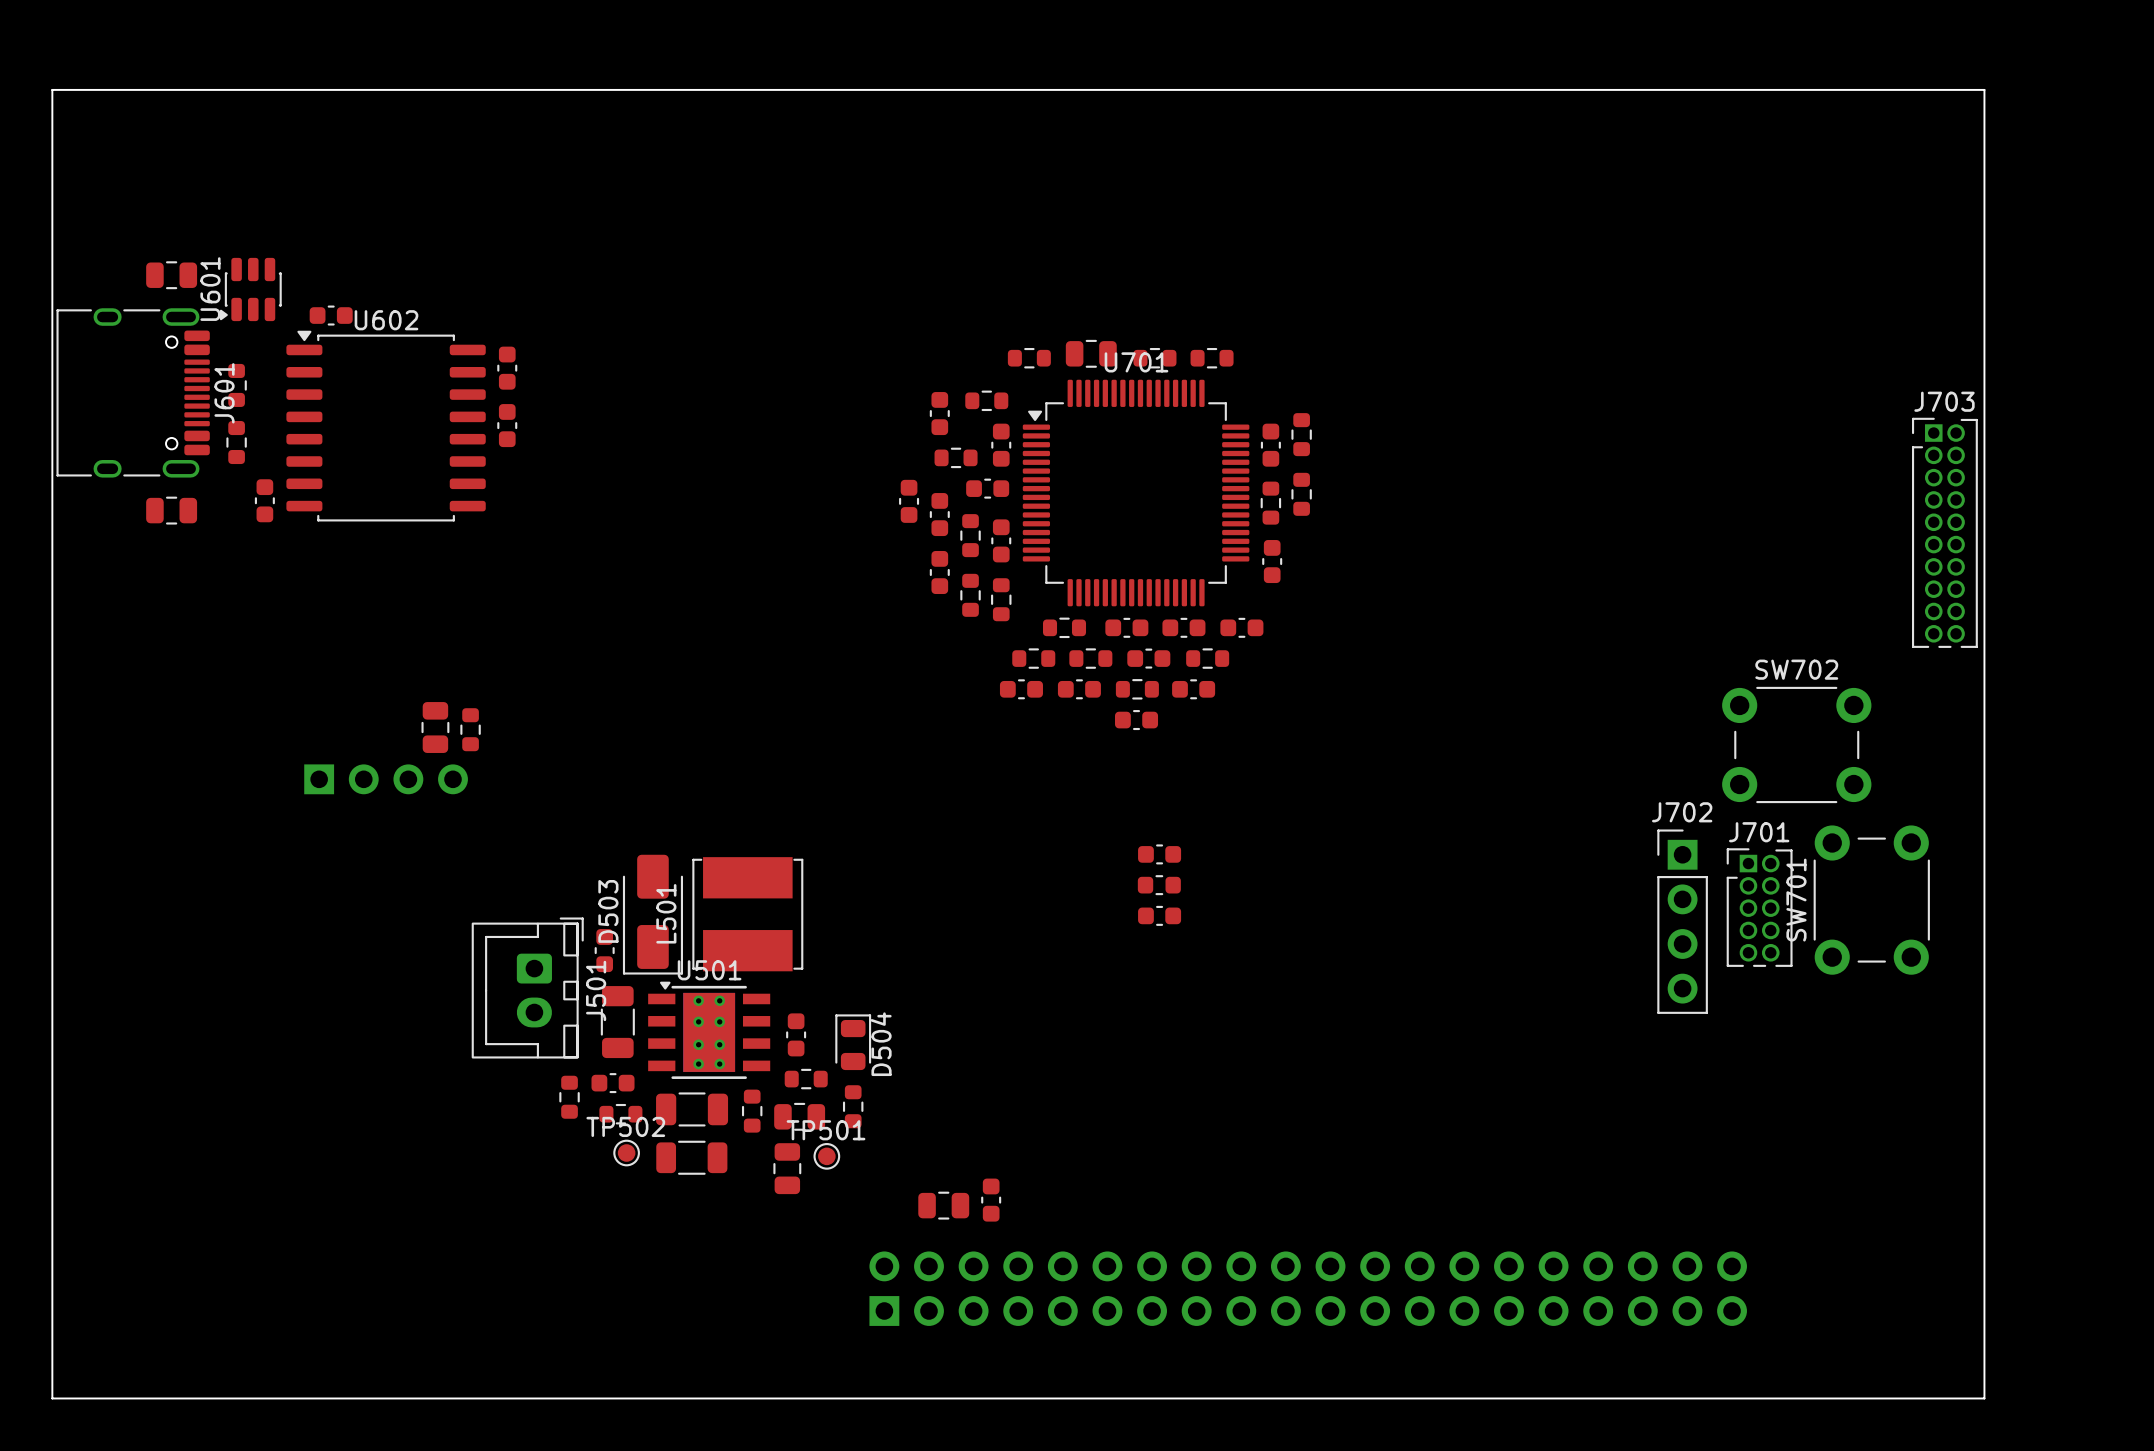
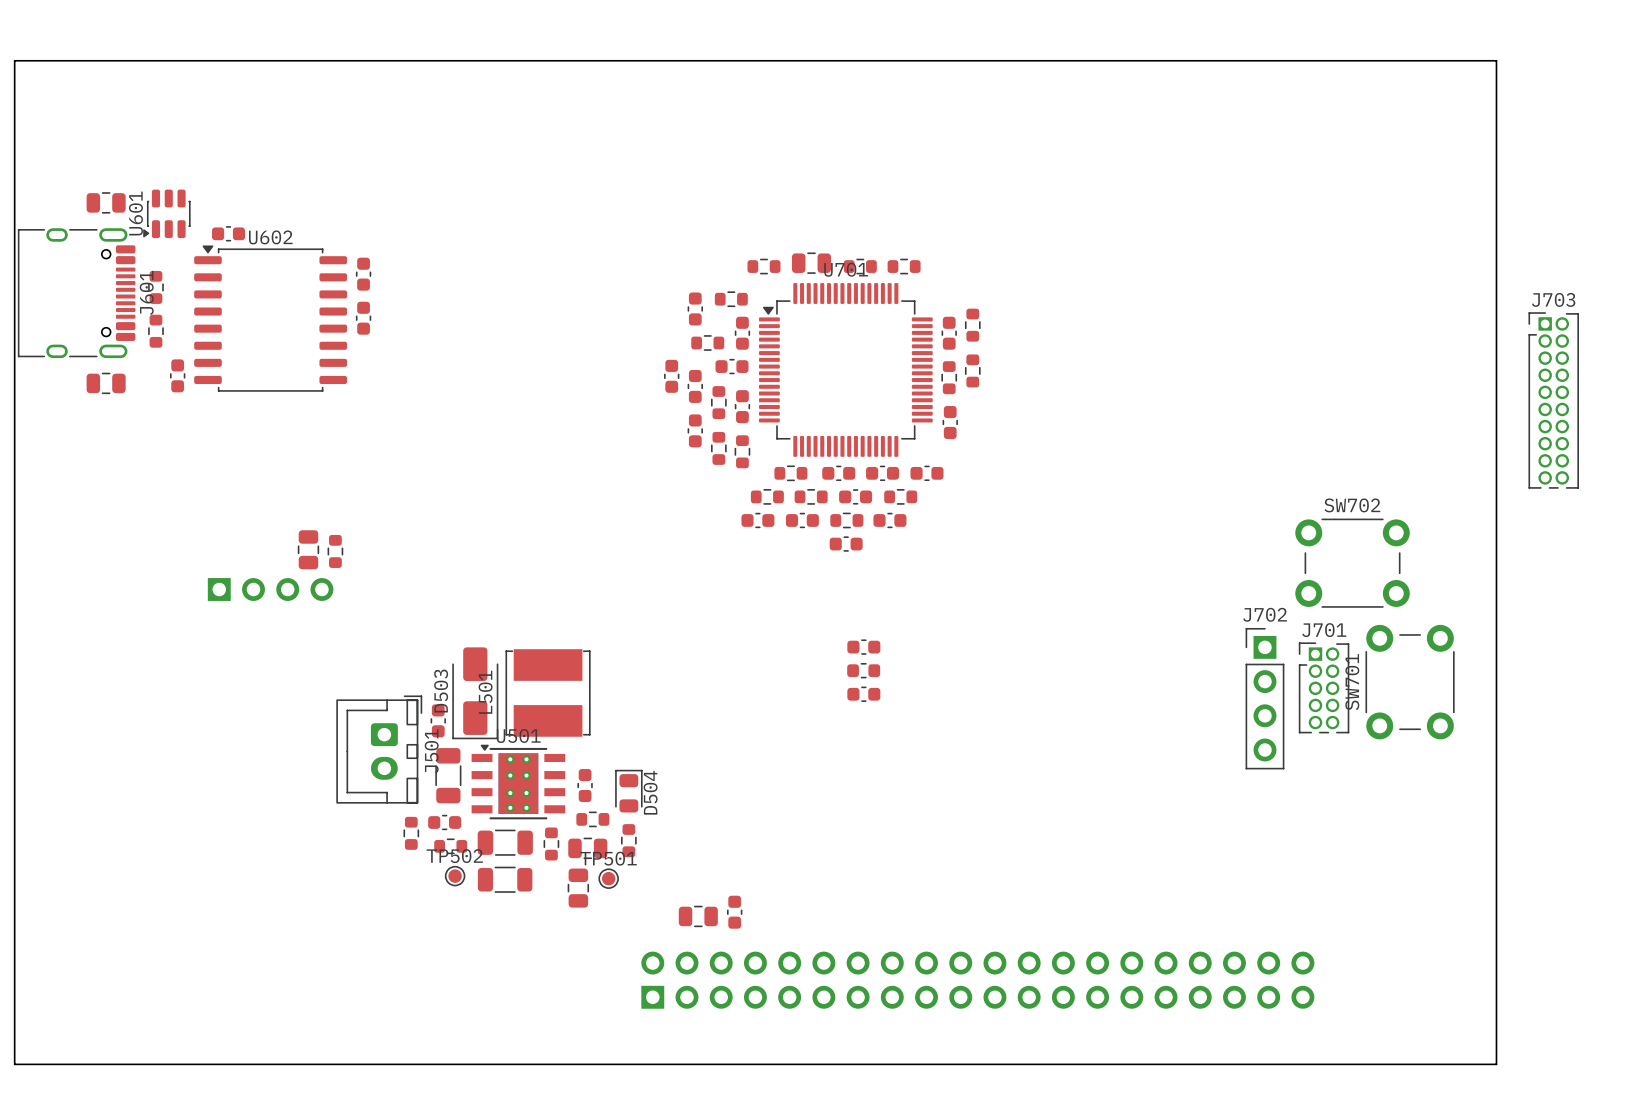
J703 position: (1944, 532) -> (1553, 400)

